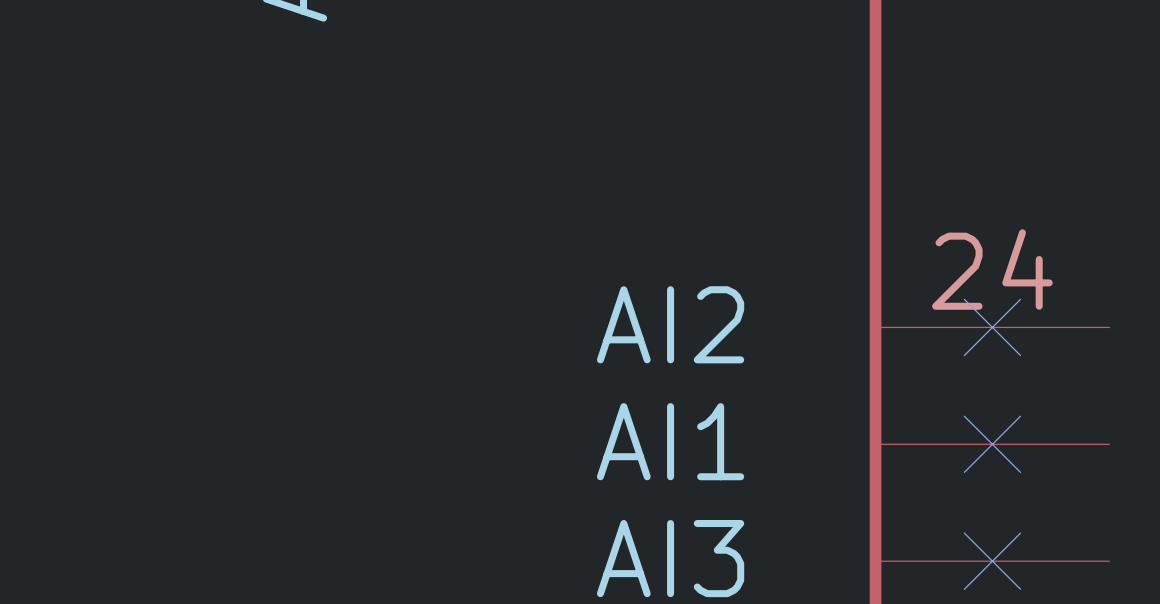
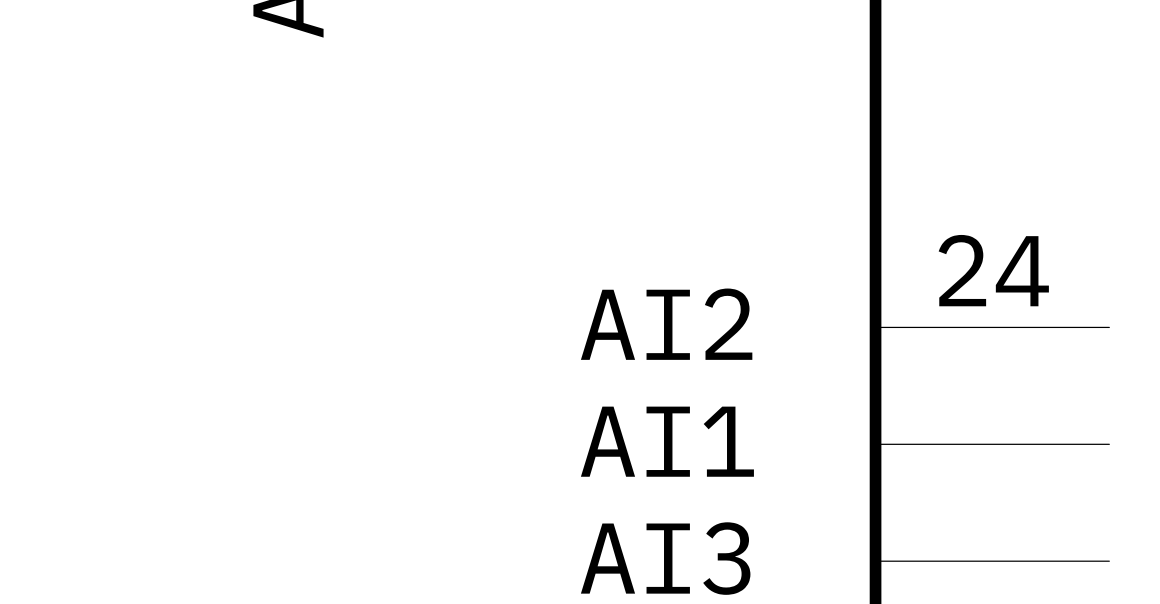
no-connect mark: (992, 327) -> none
no-connect mark: (992, 444) -> none
no-connect mark: (992, 561) -> none

